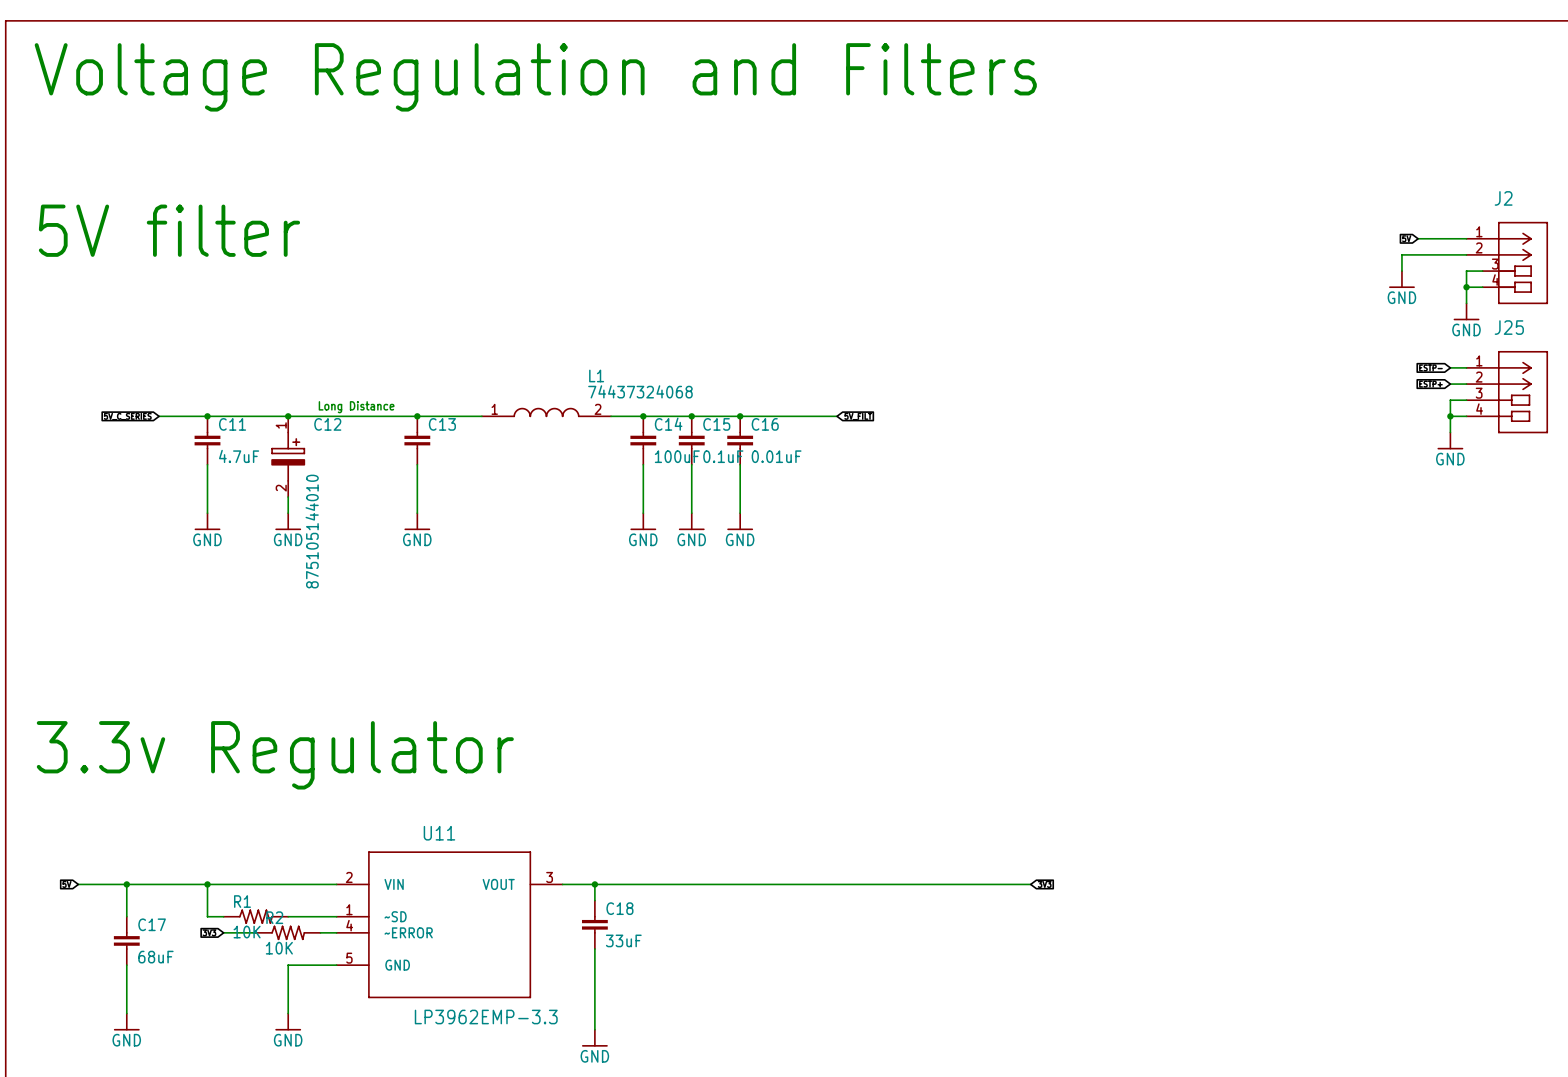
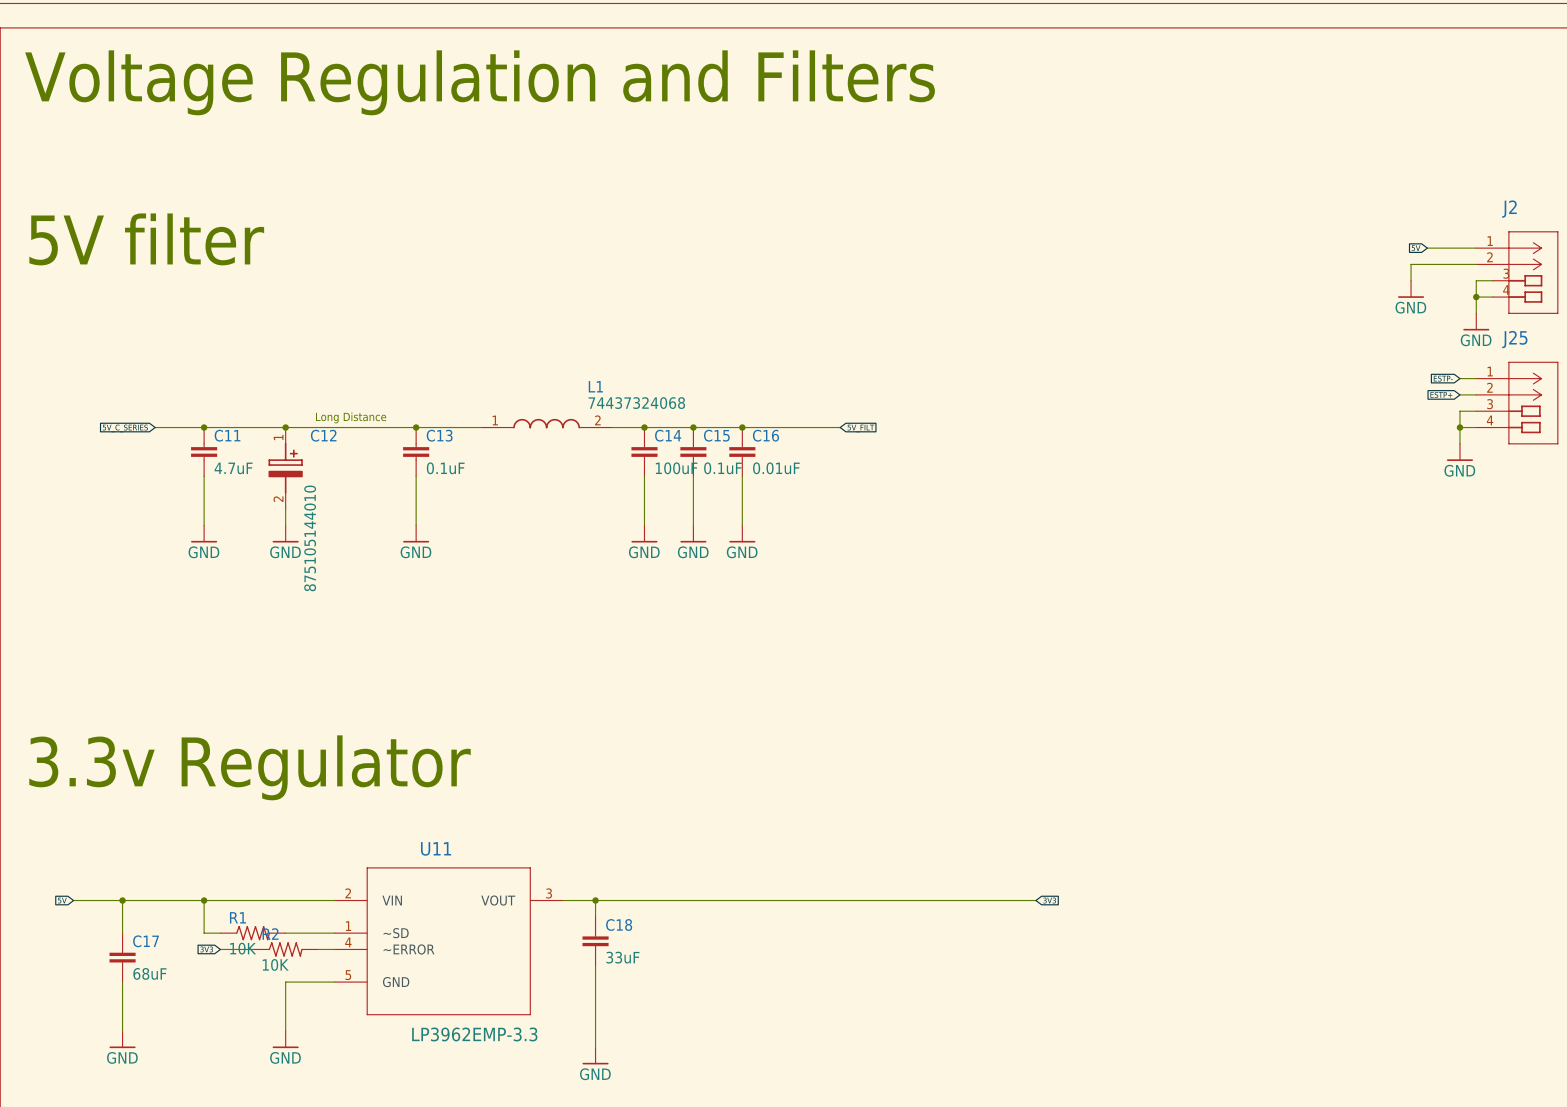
C13 value: none -> 0.1uF (445, 468)

